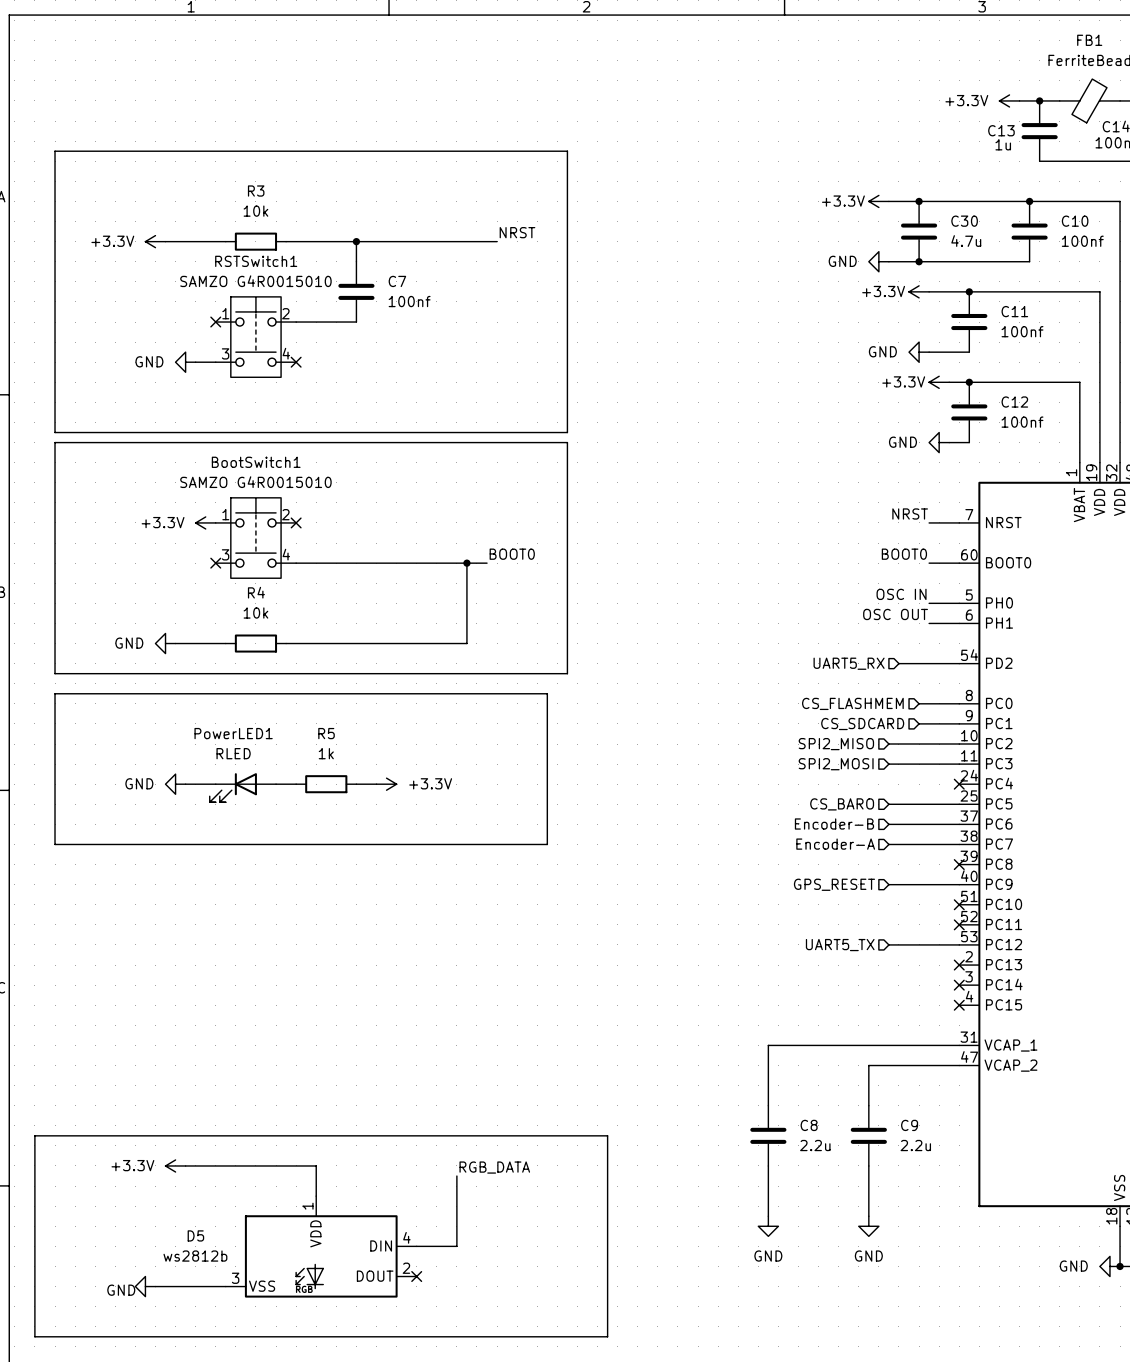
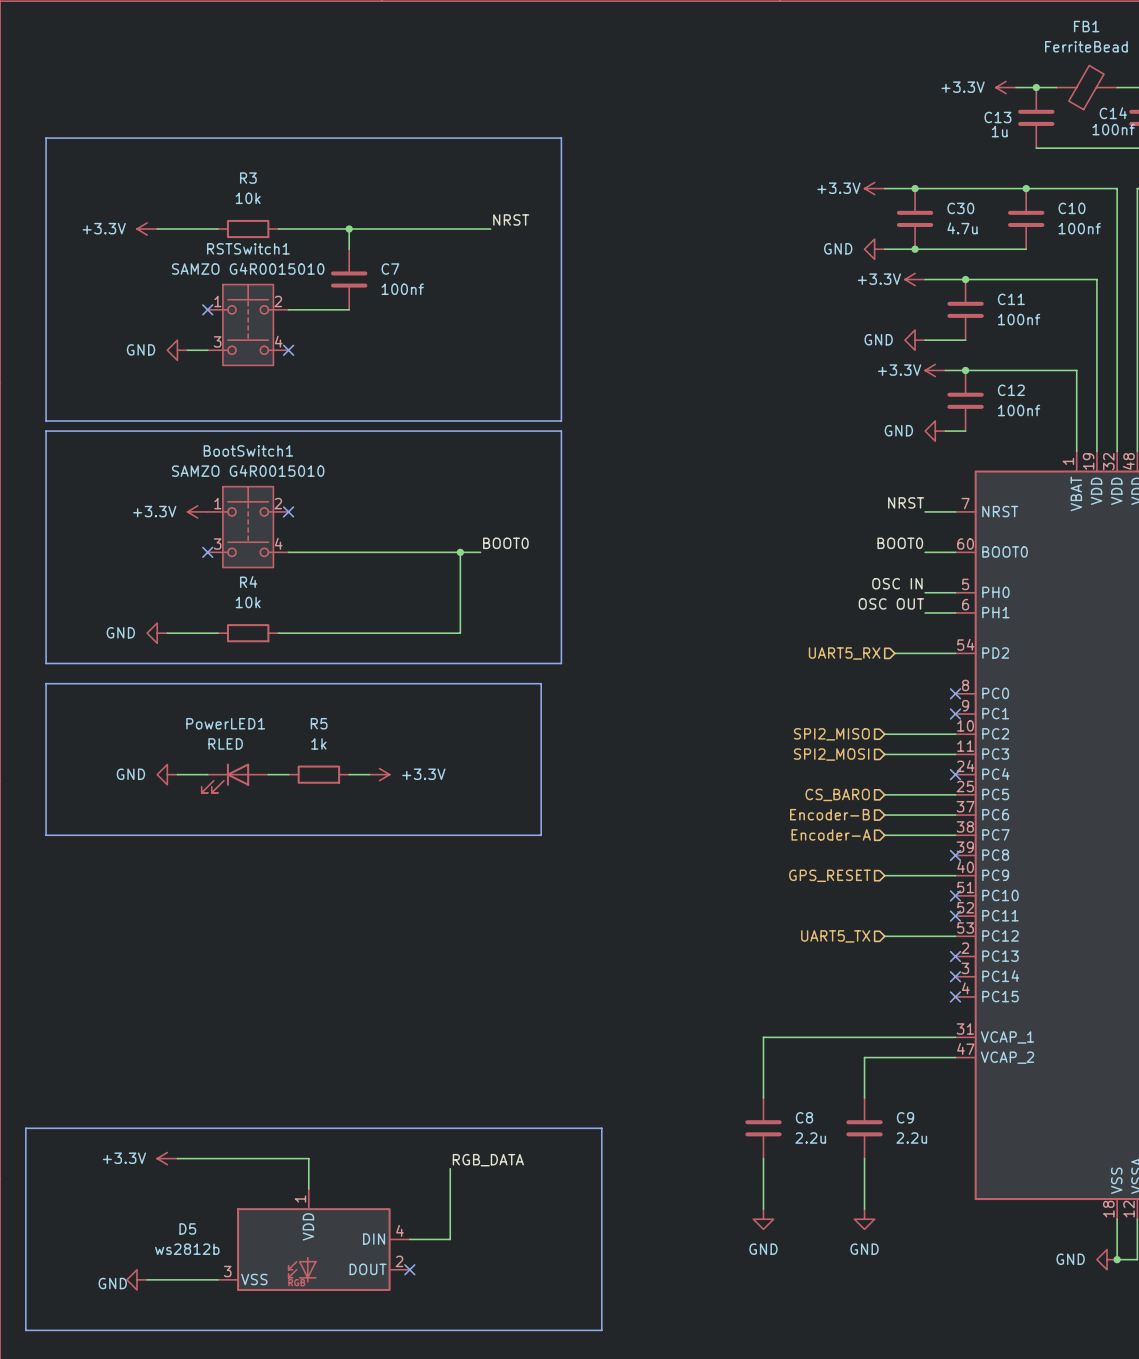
hierarchical label: CS_FLASHMEM (852, 703) -> none
wire: (919, 703) (959, 703) -> none
no-connect mark: none -> (955, 693)
wire: (919, 723) (959, 723) -> none
no-connect mark: none -> (955, 714)
hierarchical label: CS_SDCARD (862, 724) -> none

